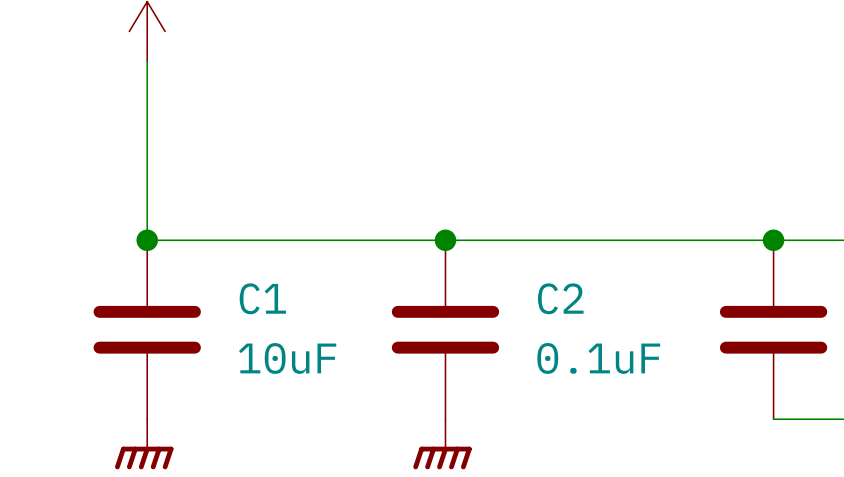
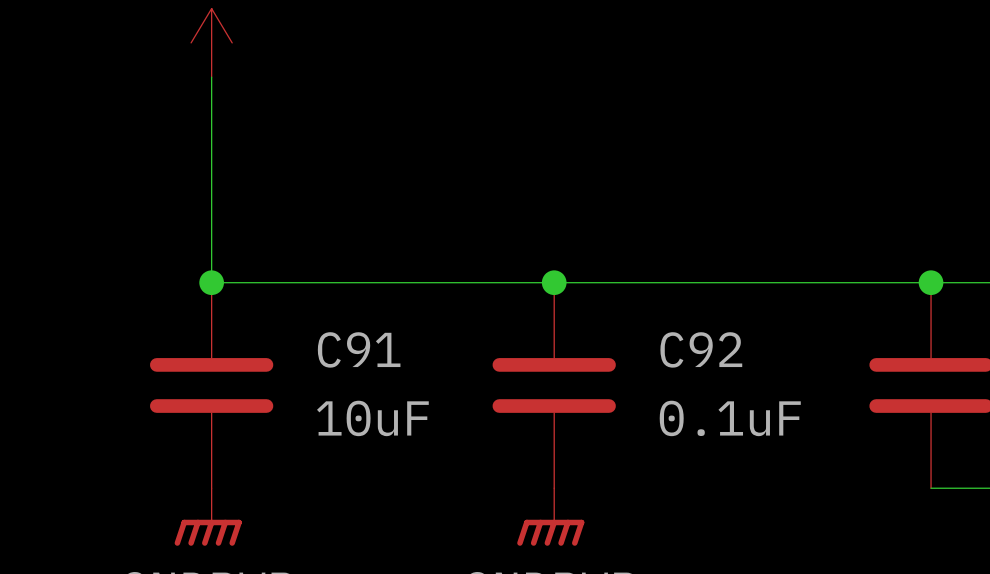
C1 name: C1 (262, 298) -> C91 (359, 349)
C2 name: C2 (560, 298) -> C92 (701, 349)

